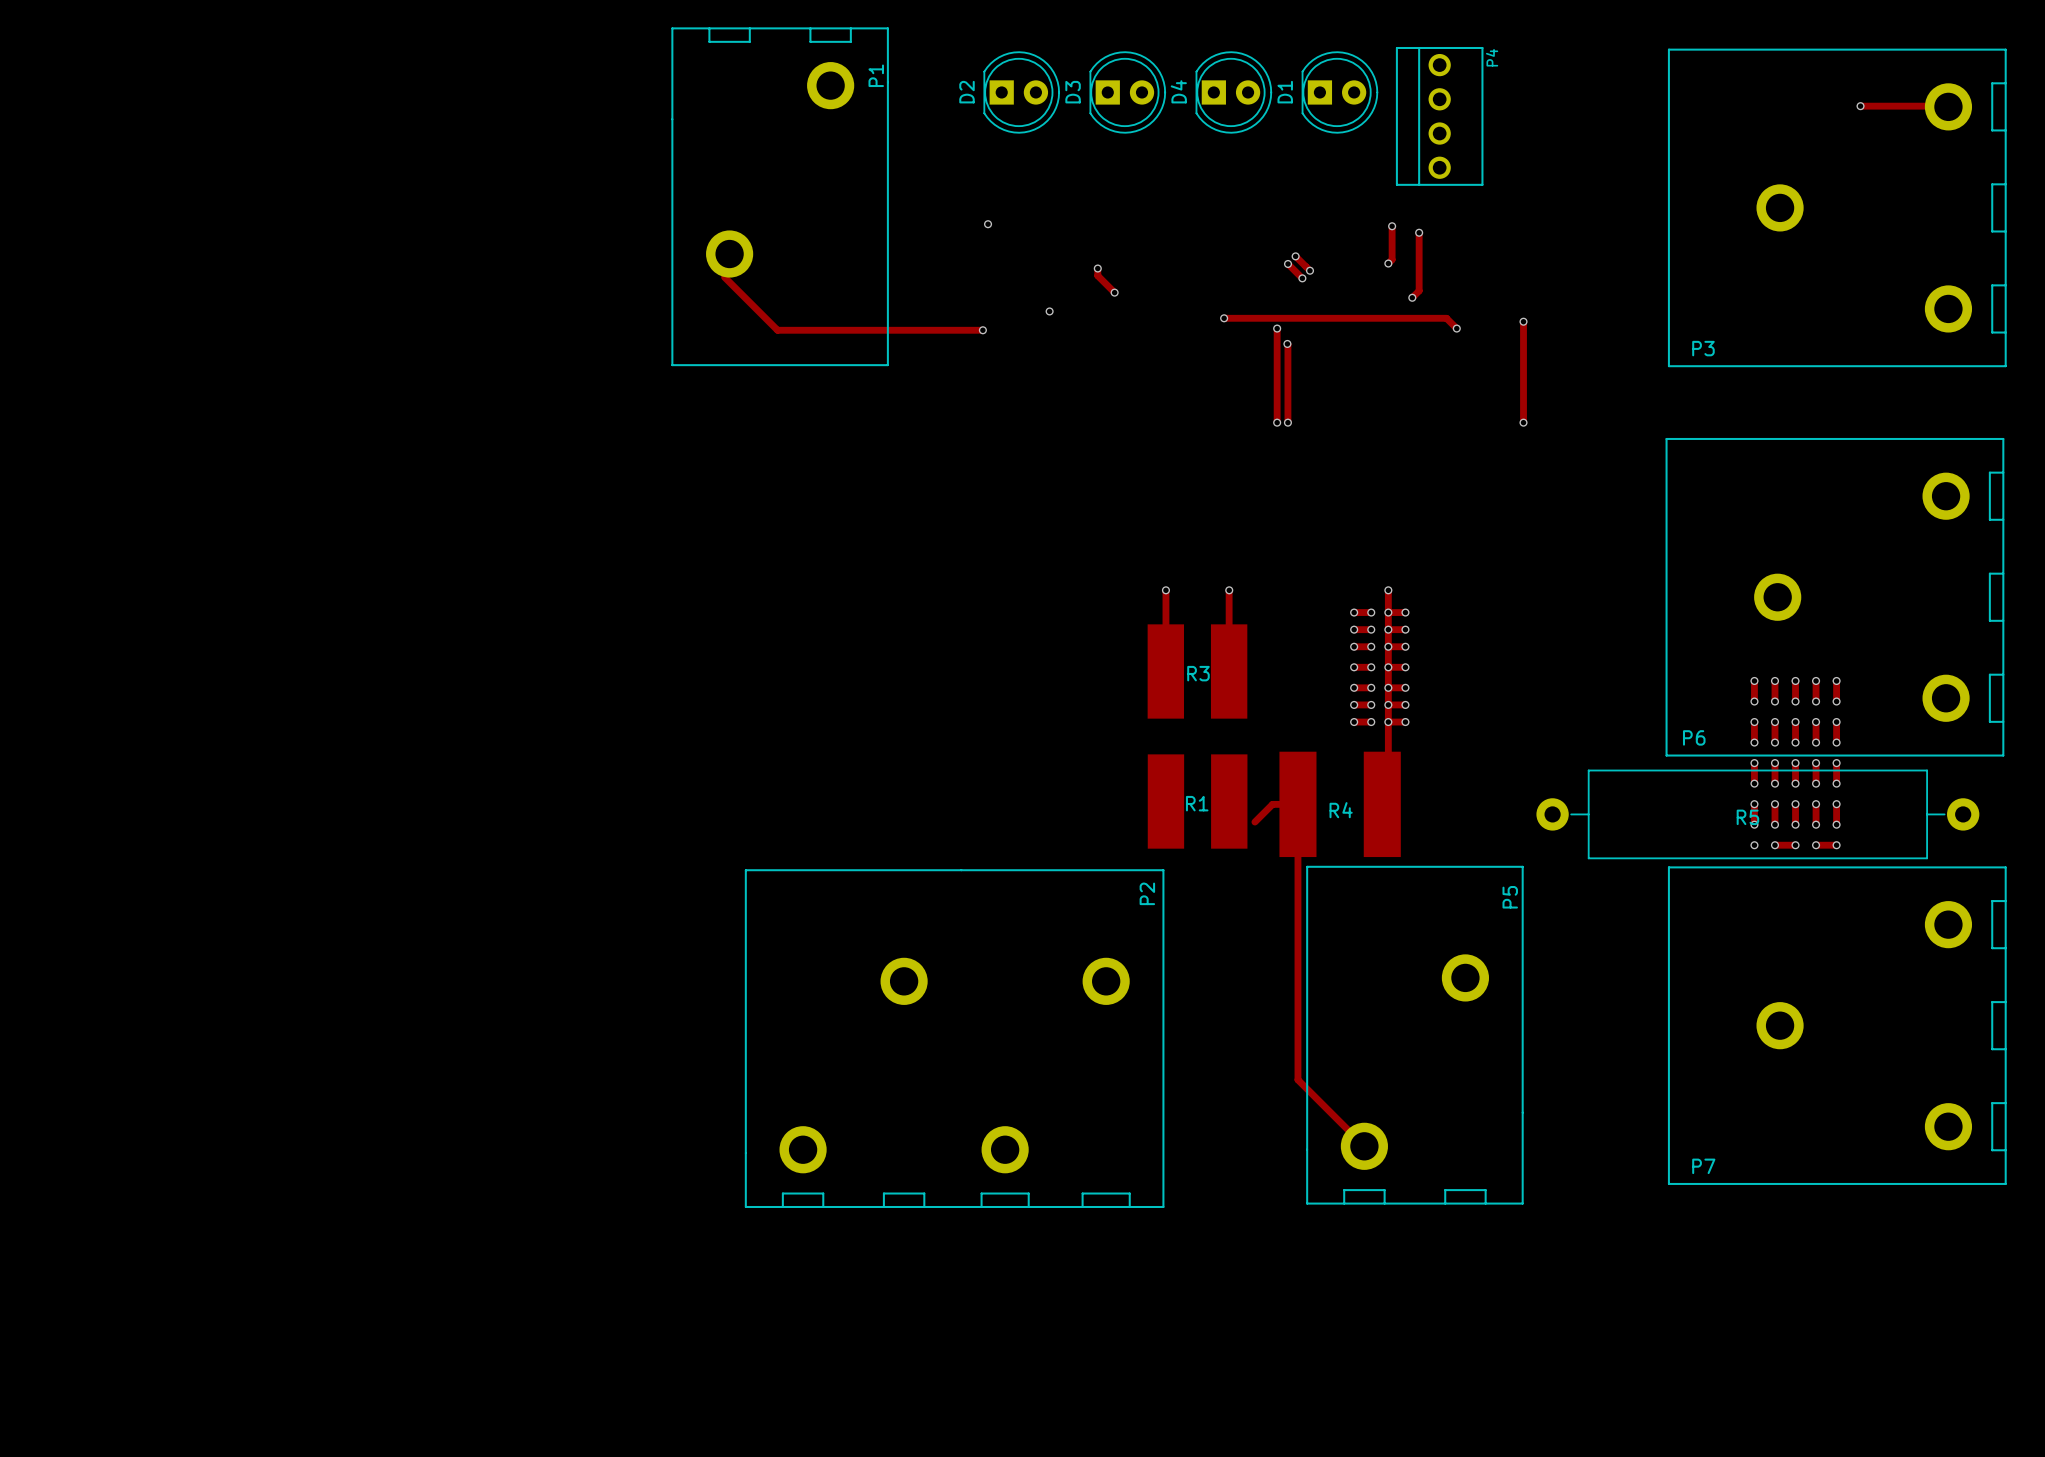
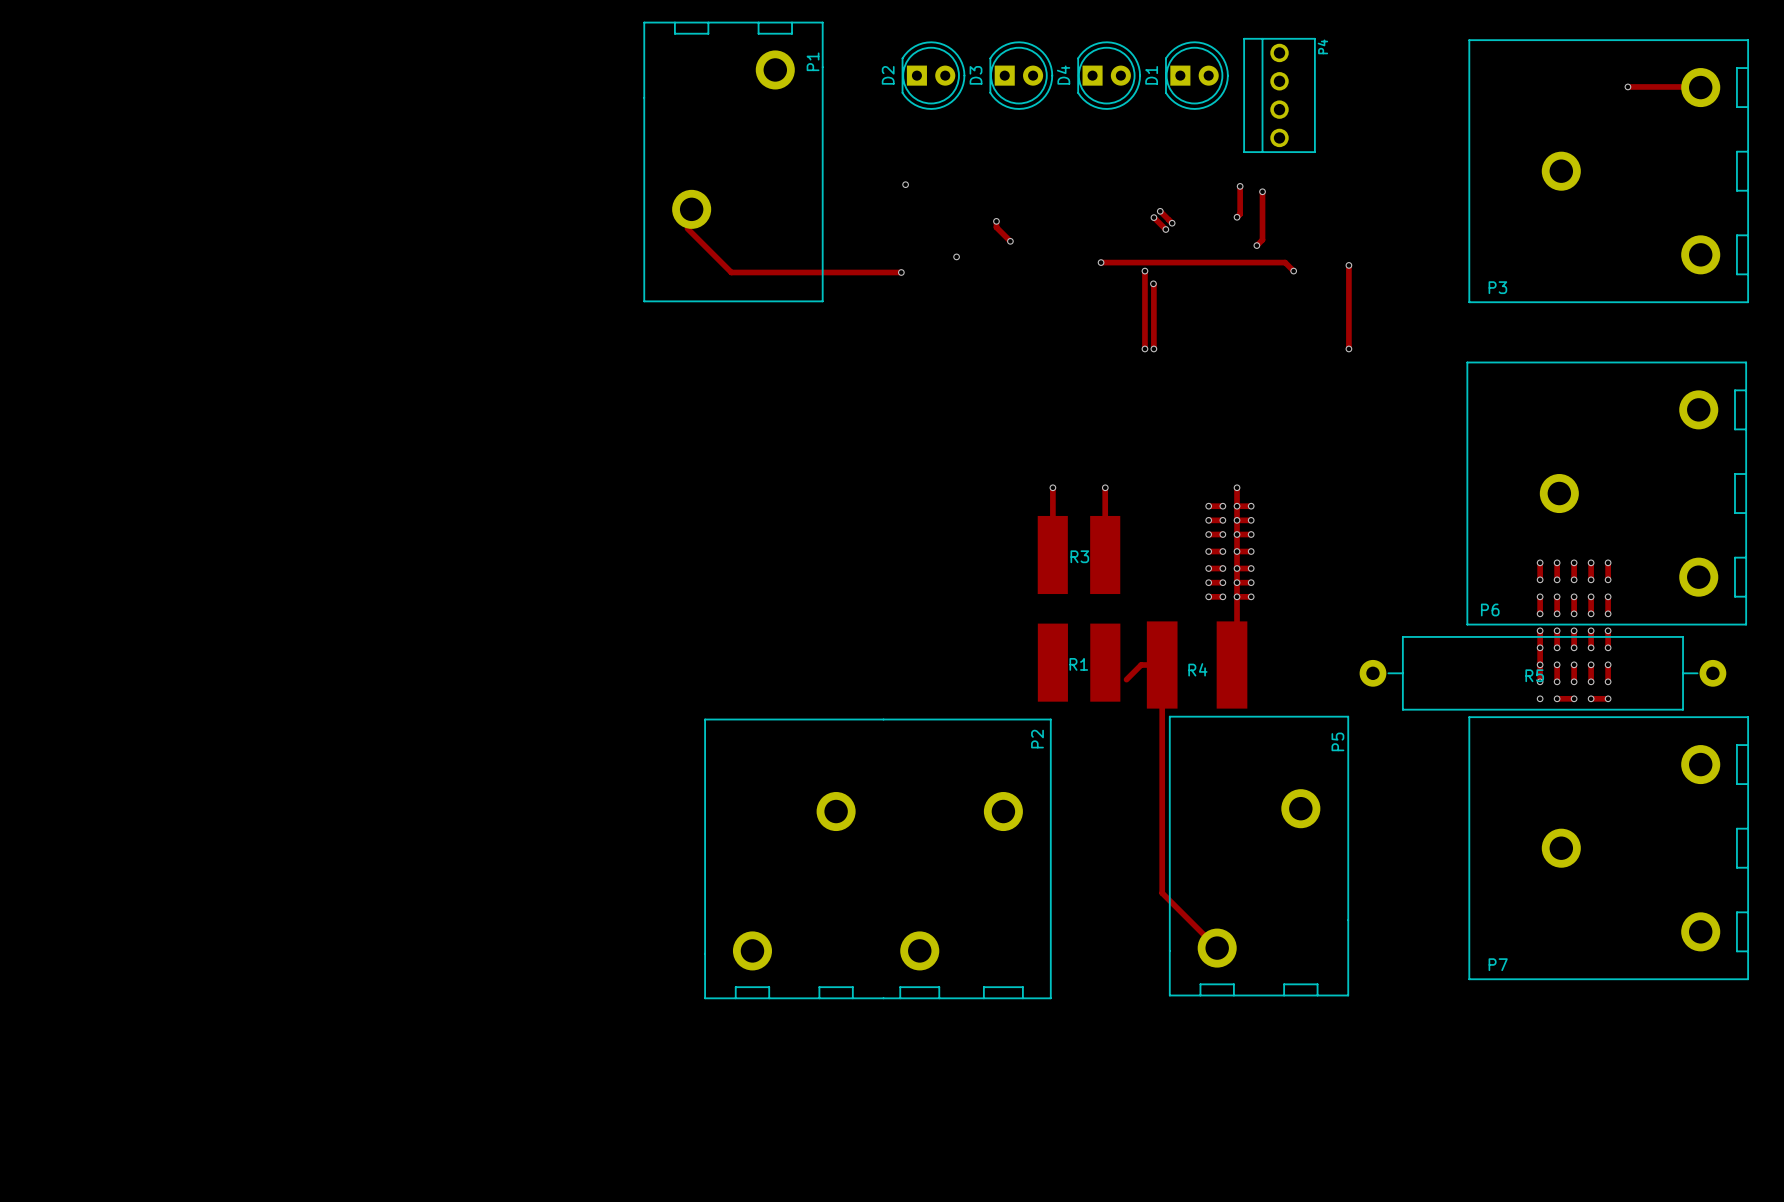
track: none -> (1540, 647) (1540, 664)

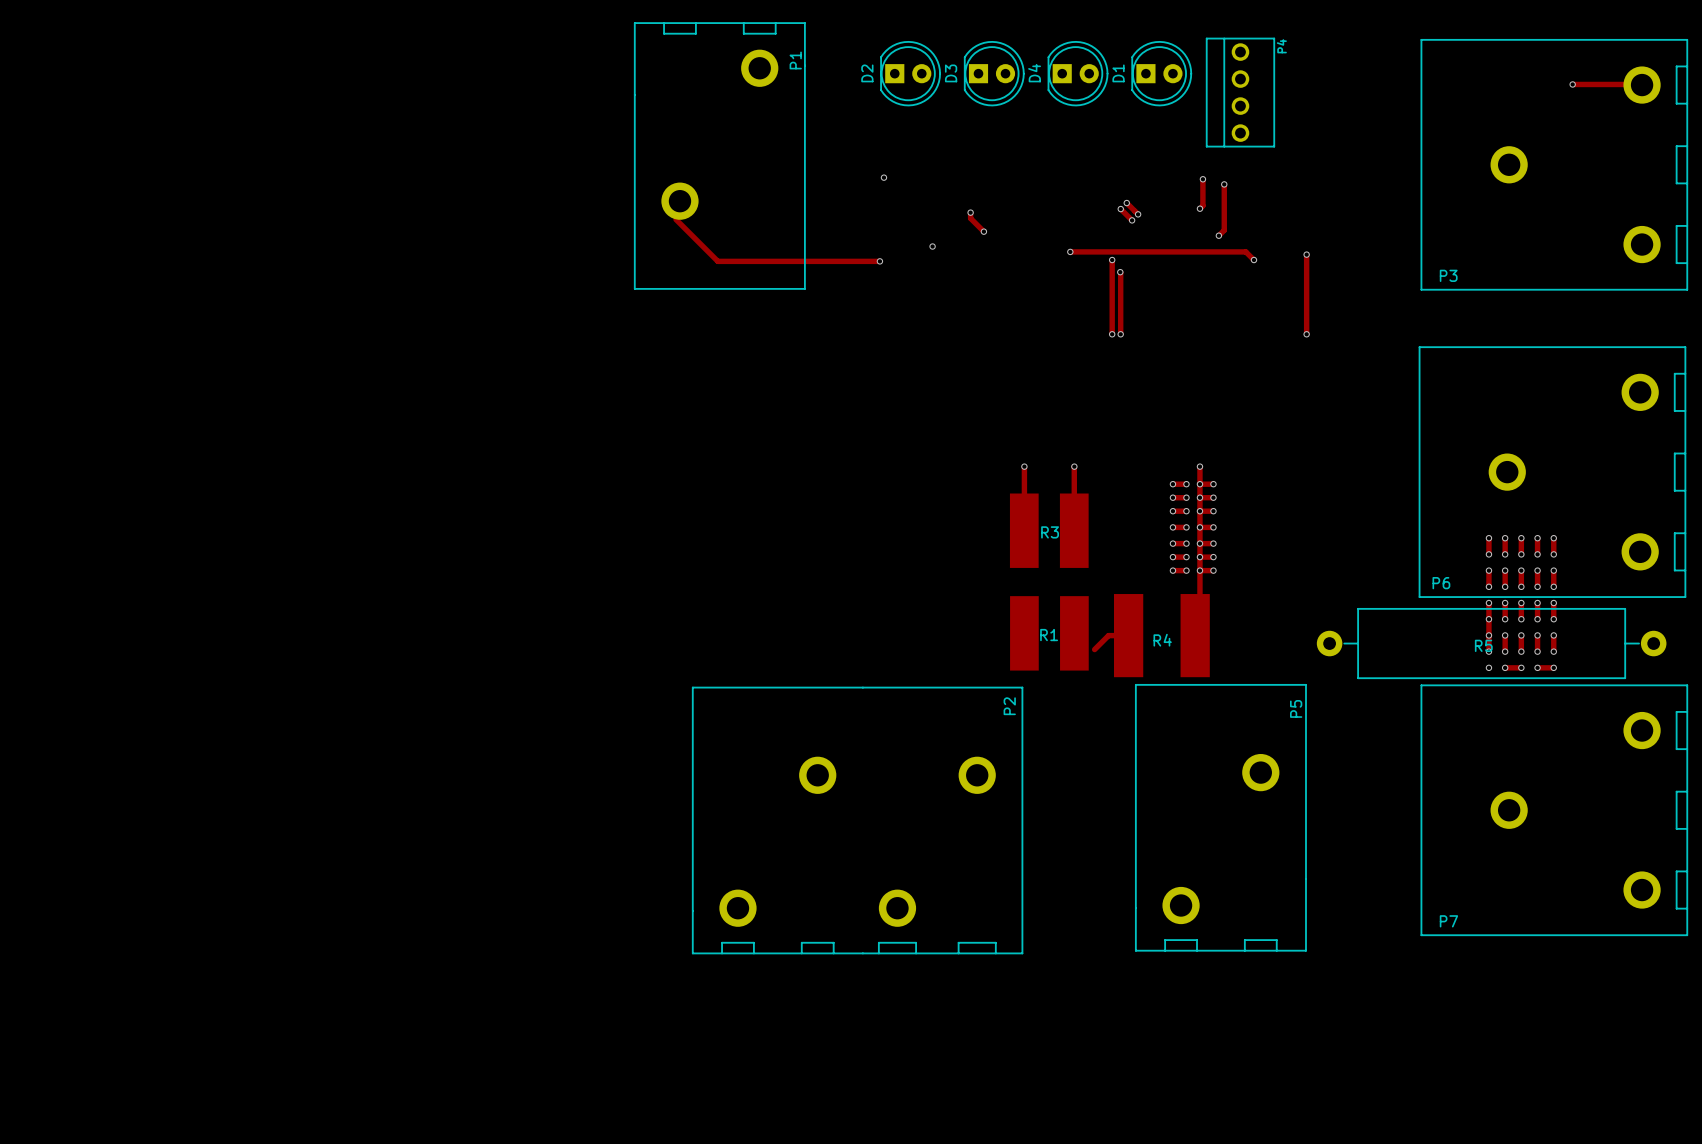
track: (1162, 665) (1162, 893) (1217, 948) -> none

